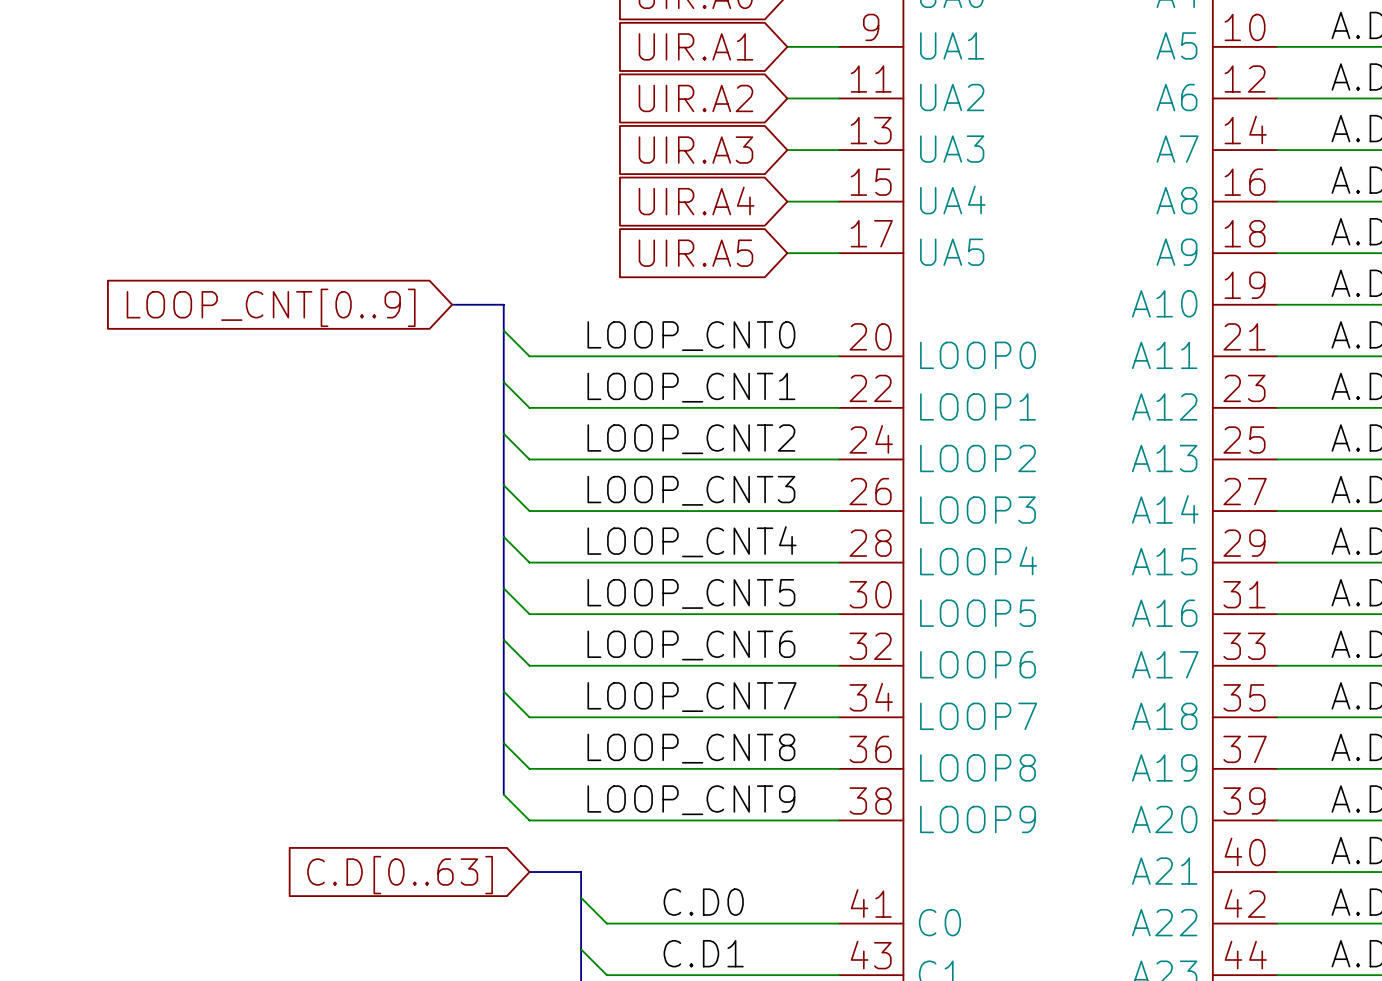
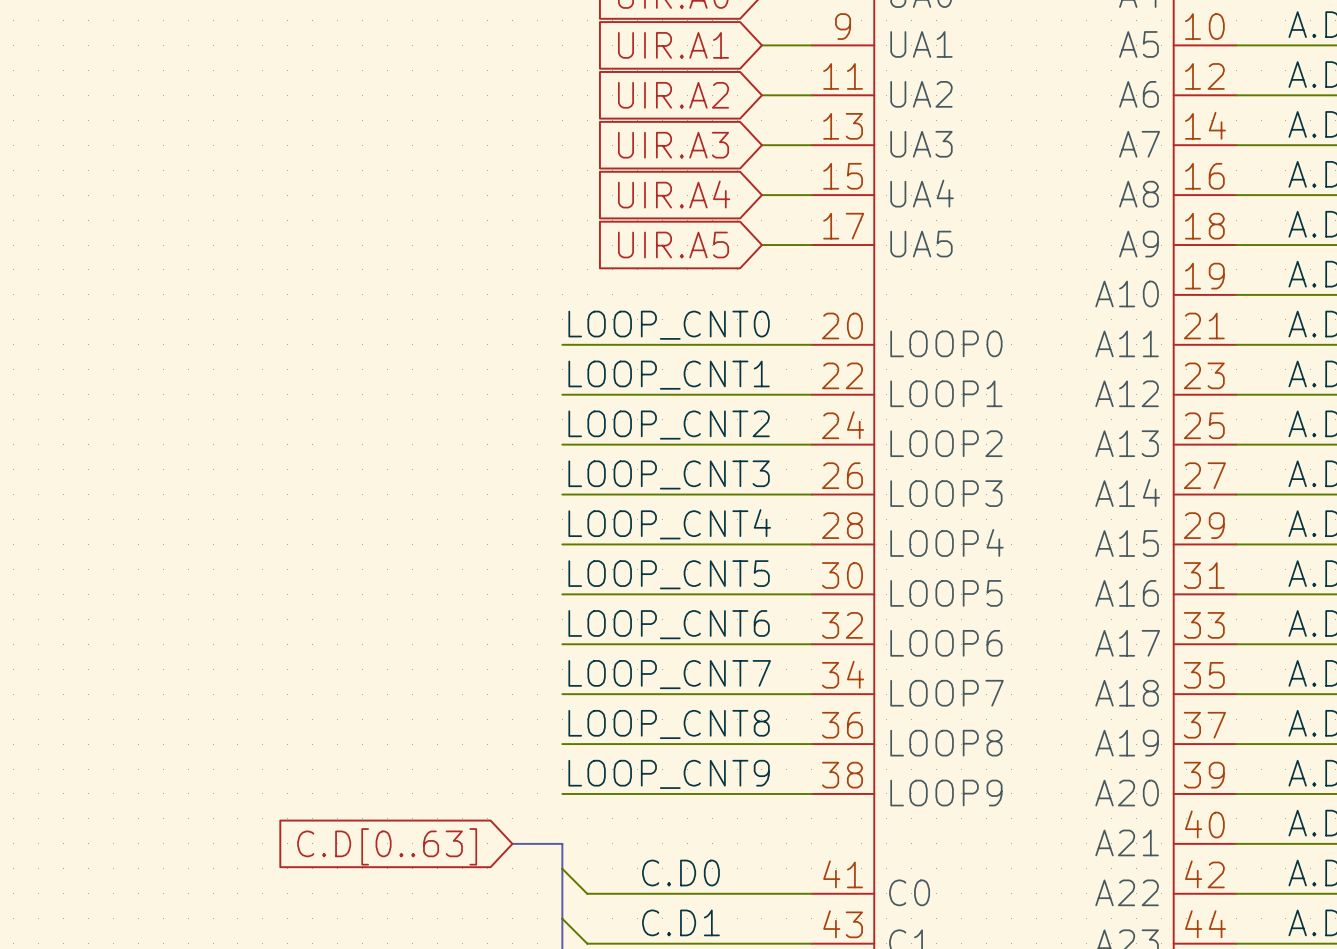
bus: (452, 304) (503, 304) (503, 794) -> none
global label: LOOP_CNT[0..9] (271, 307) -> none
wire: (503, 330) (529, 356) (581, 356) -> none
wire: (503, 382) (529, 407) (581, 407) -> none
wire: (503, 433) (529, 459) (581, 459) -> none
wire: (503, 485) (529, 511) (581, 511) -> none
wire: (503, 536) (529, 562) (581, 562) -> none
wire: (503, 588) (529, 614) (581, 614) -> none
wire: (503, 639) (529, 665) (581, 665) -> none
wire: (503, 691) (529, 717) (581, 717) -> none
wire: (503, 743) (529, 768) (581, 768) -> none
wire: (503, 794) (529, 820) (581, 820) -> none

